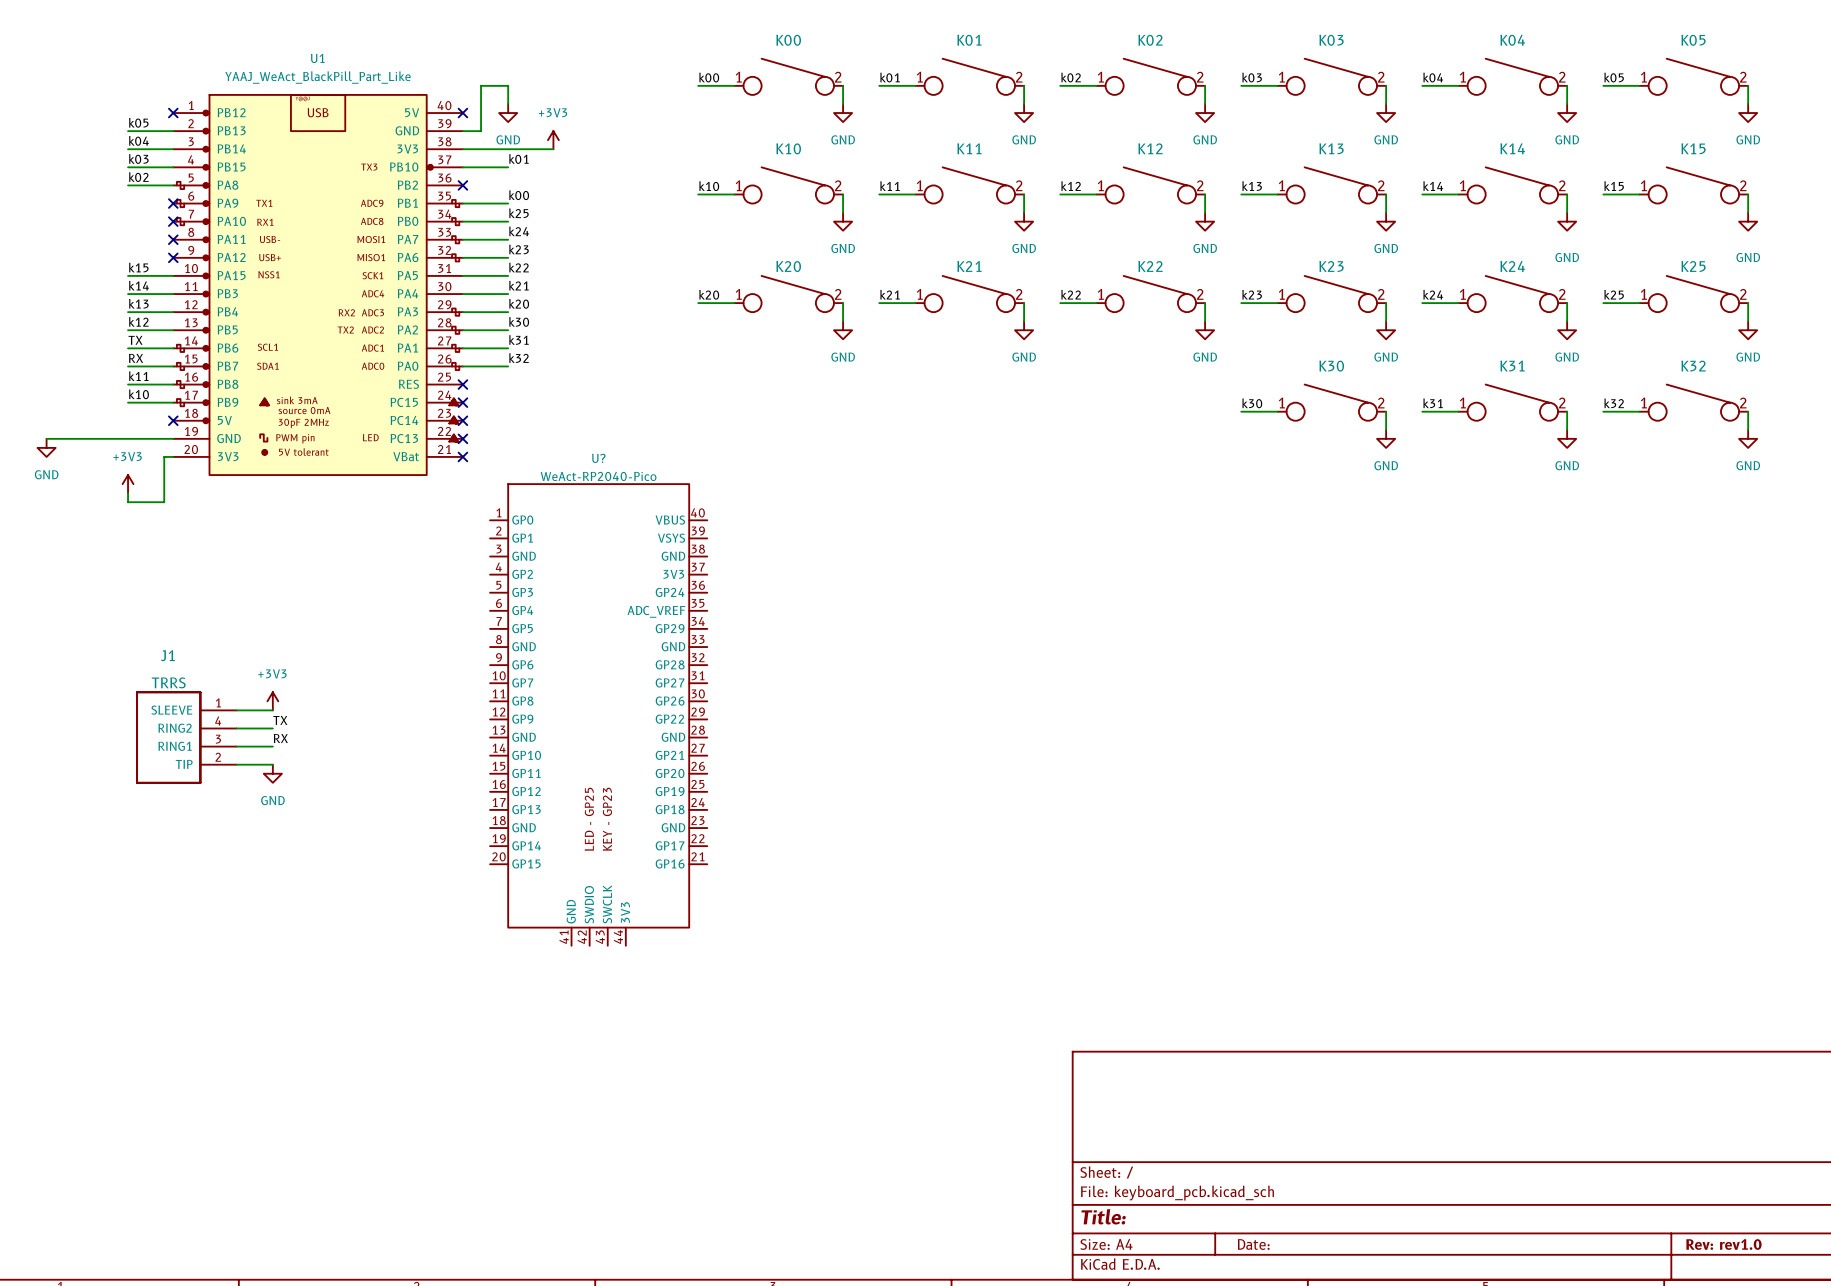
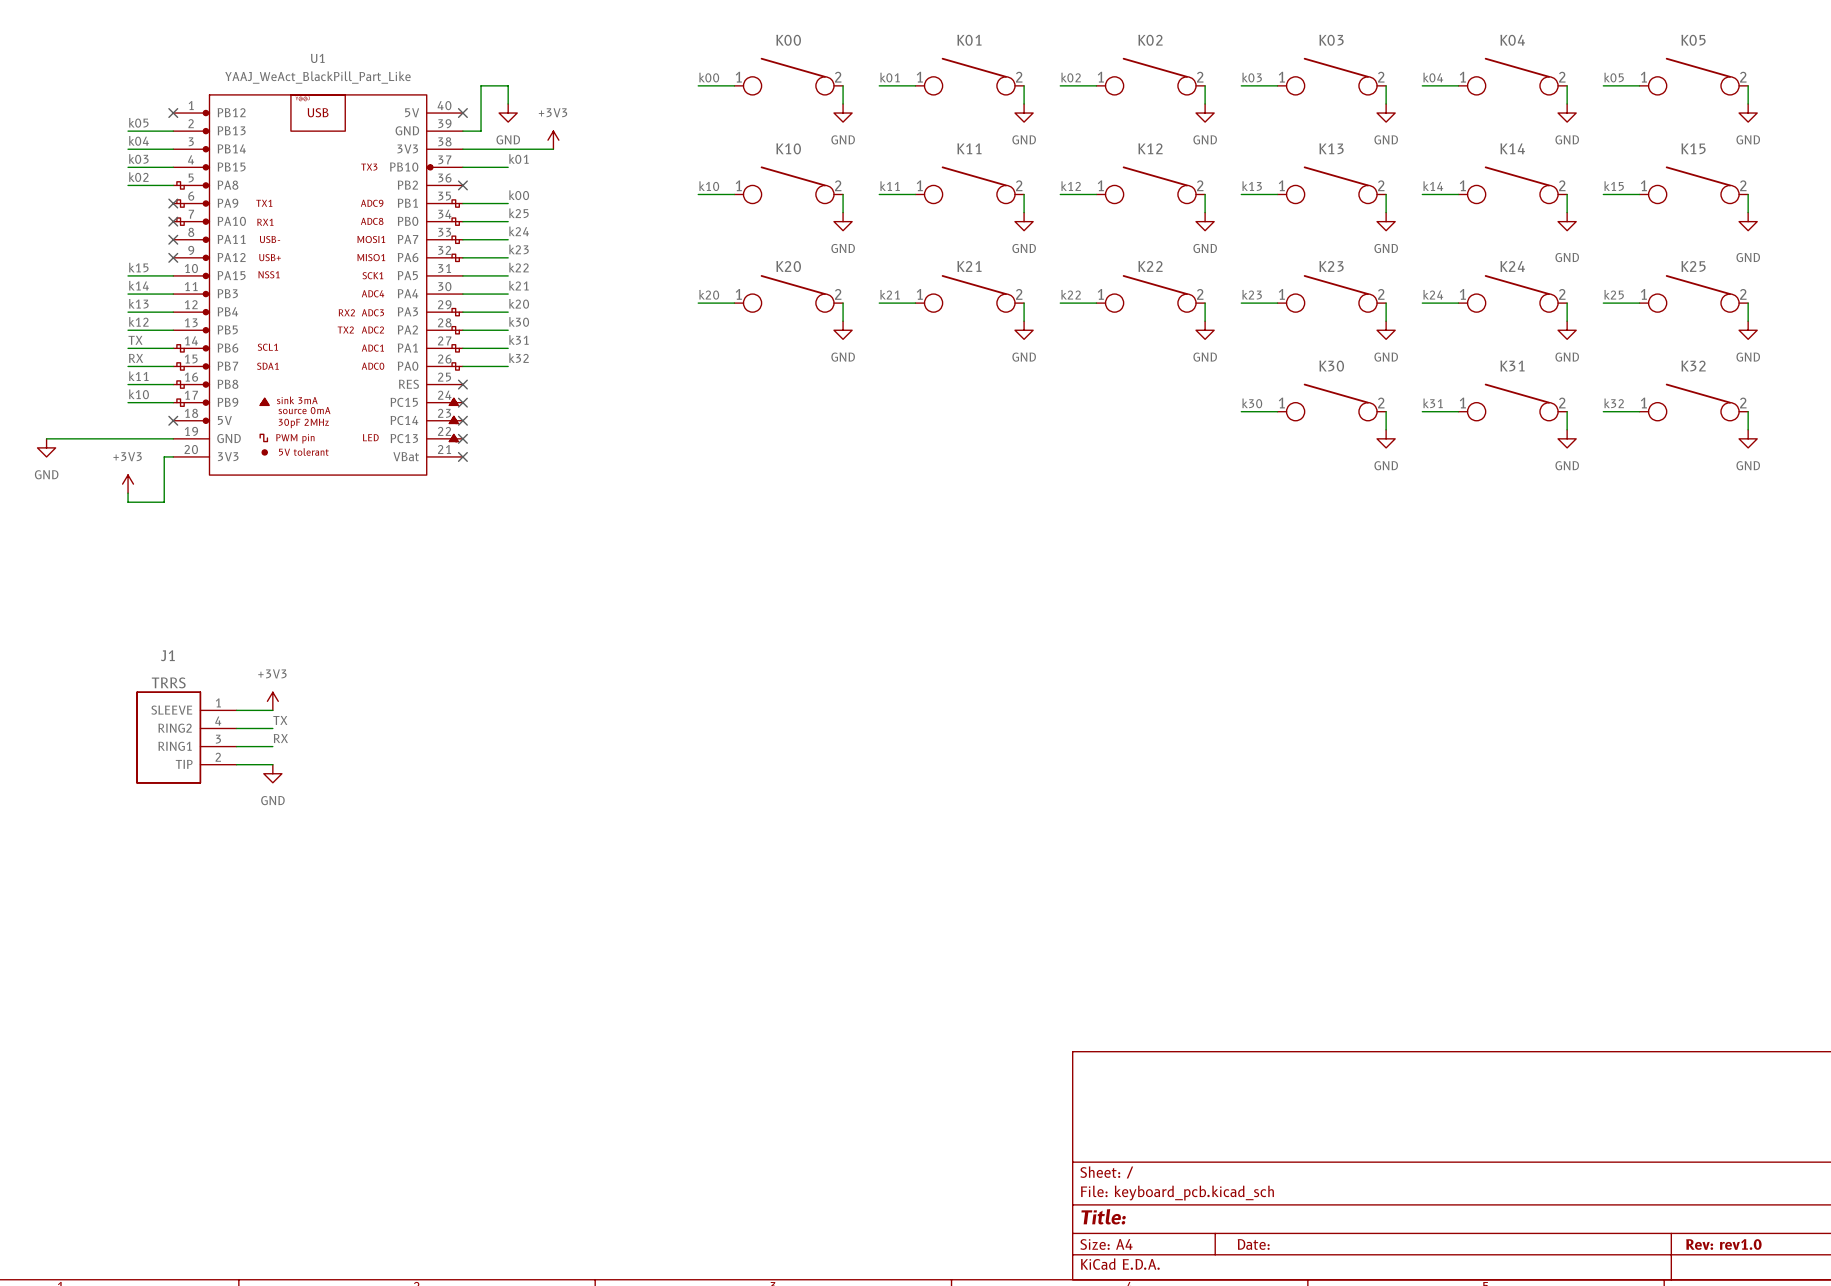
U?: WeAct-RP2040-Pico (598, 714) -> none

